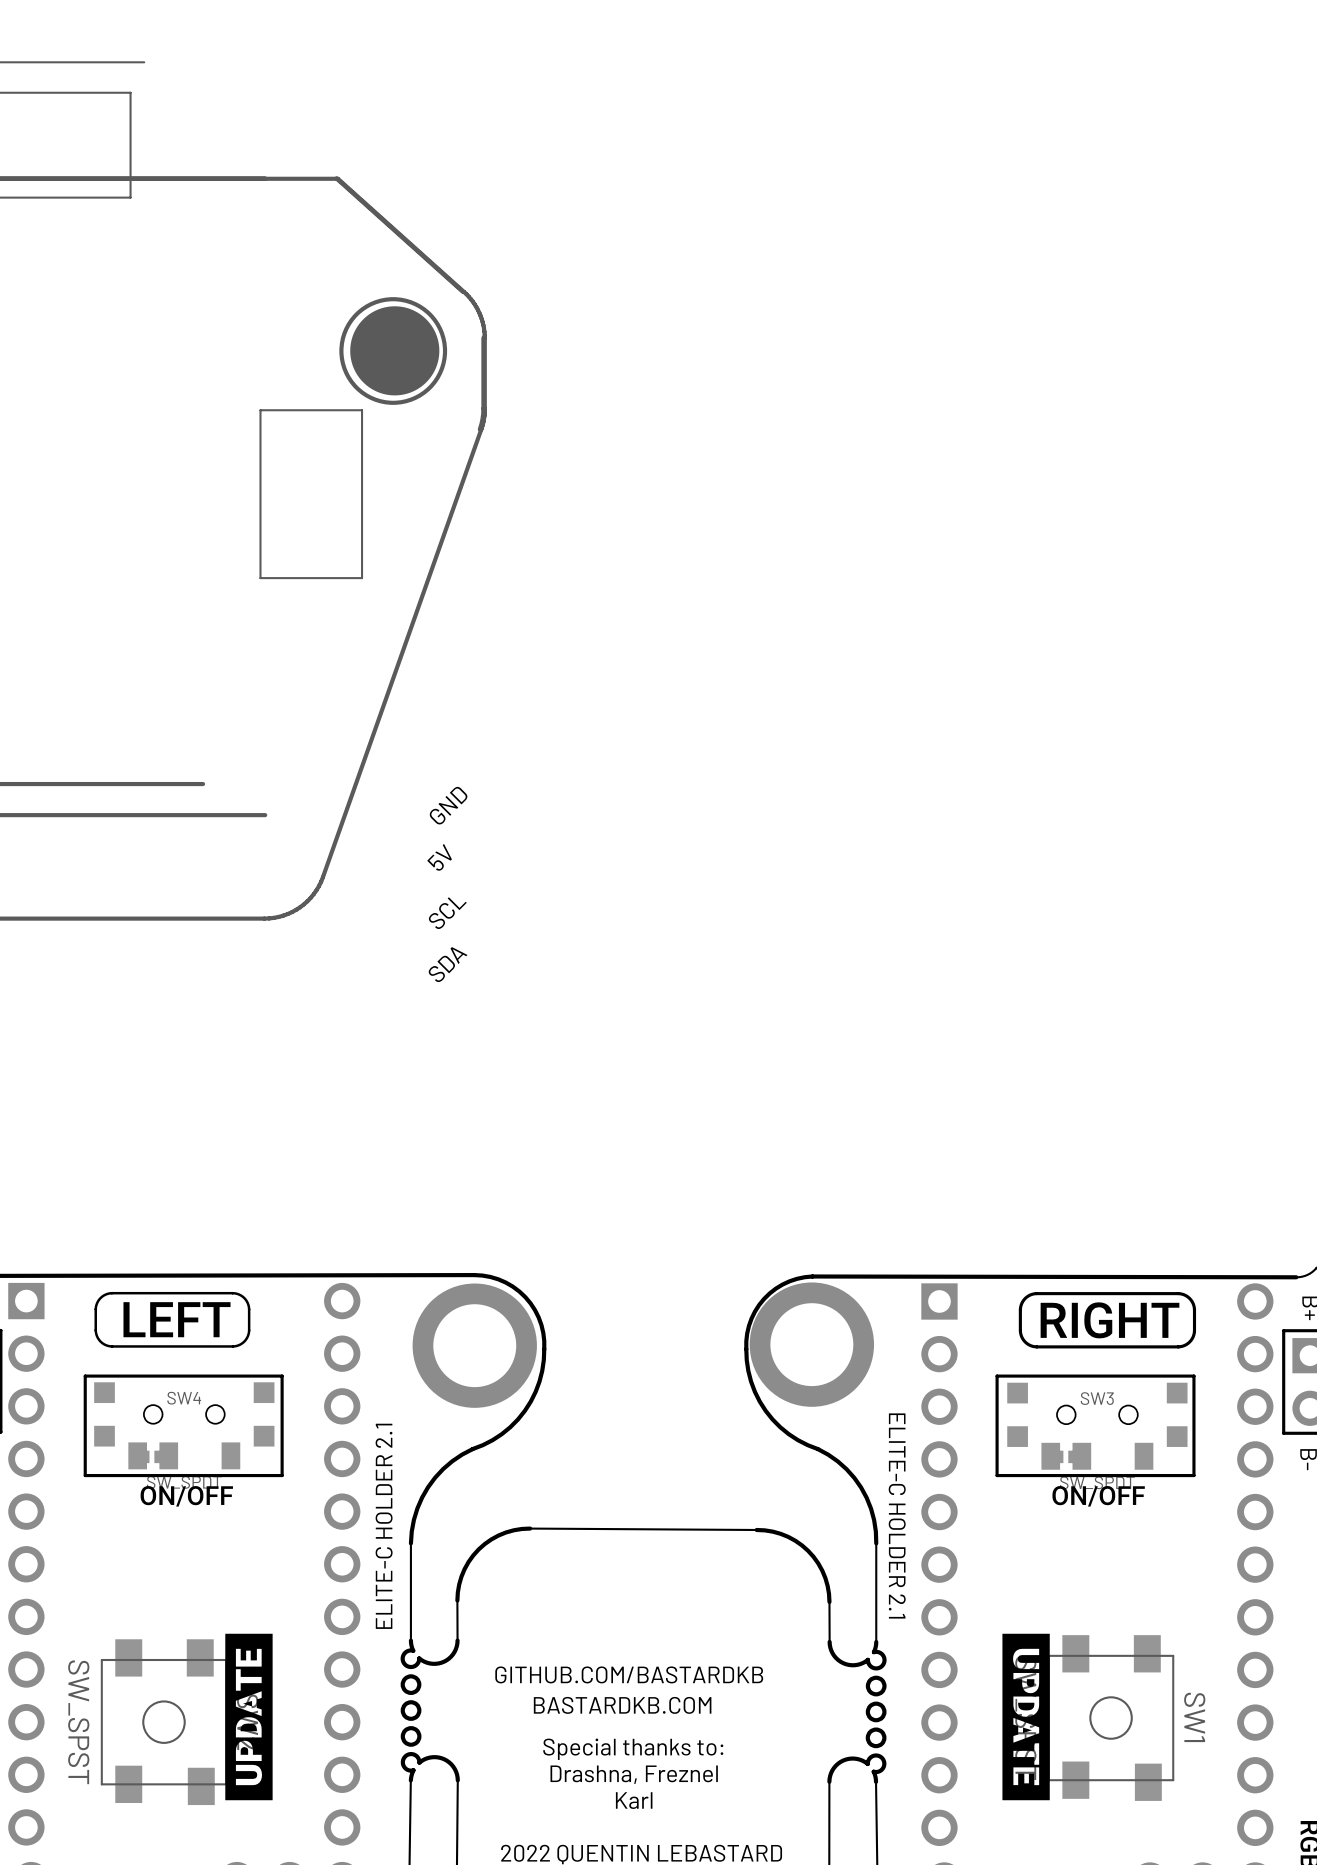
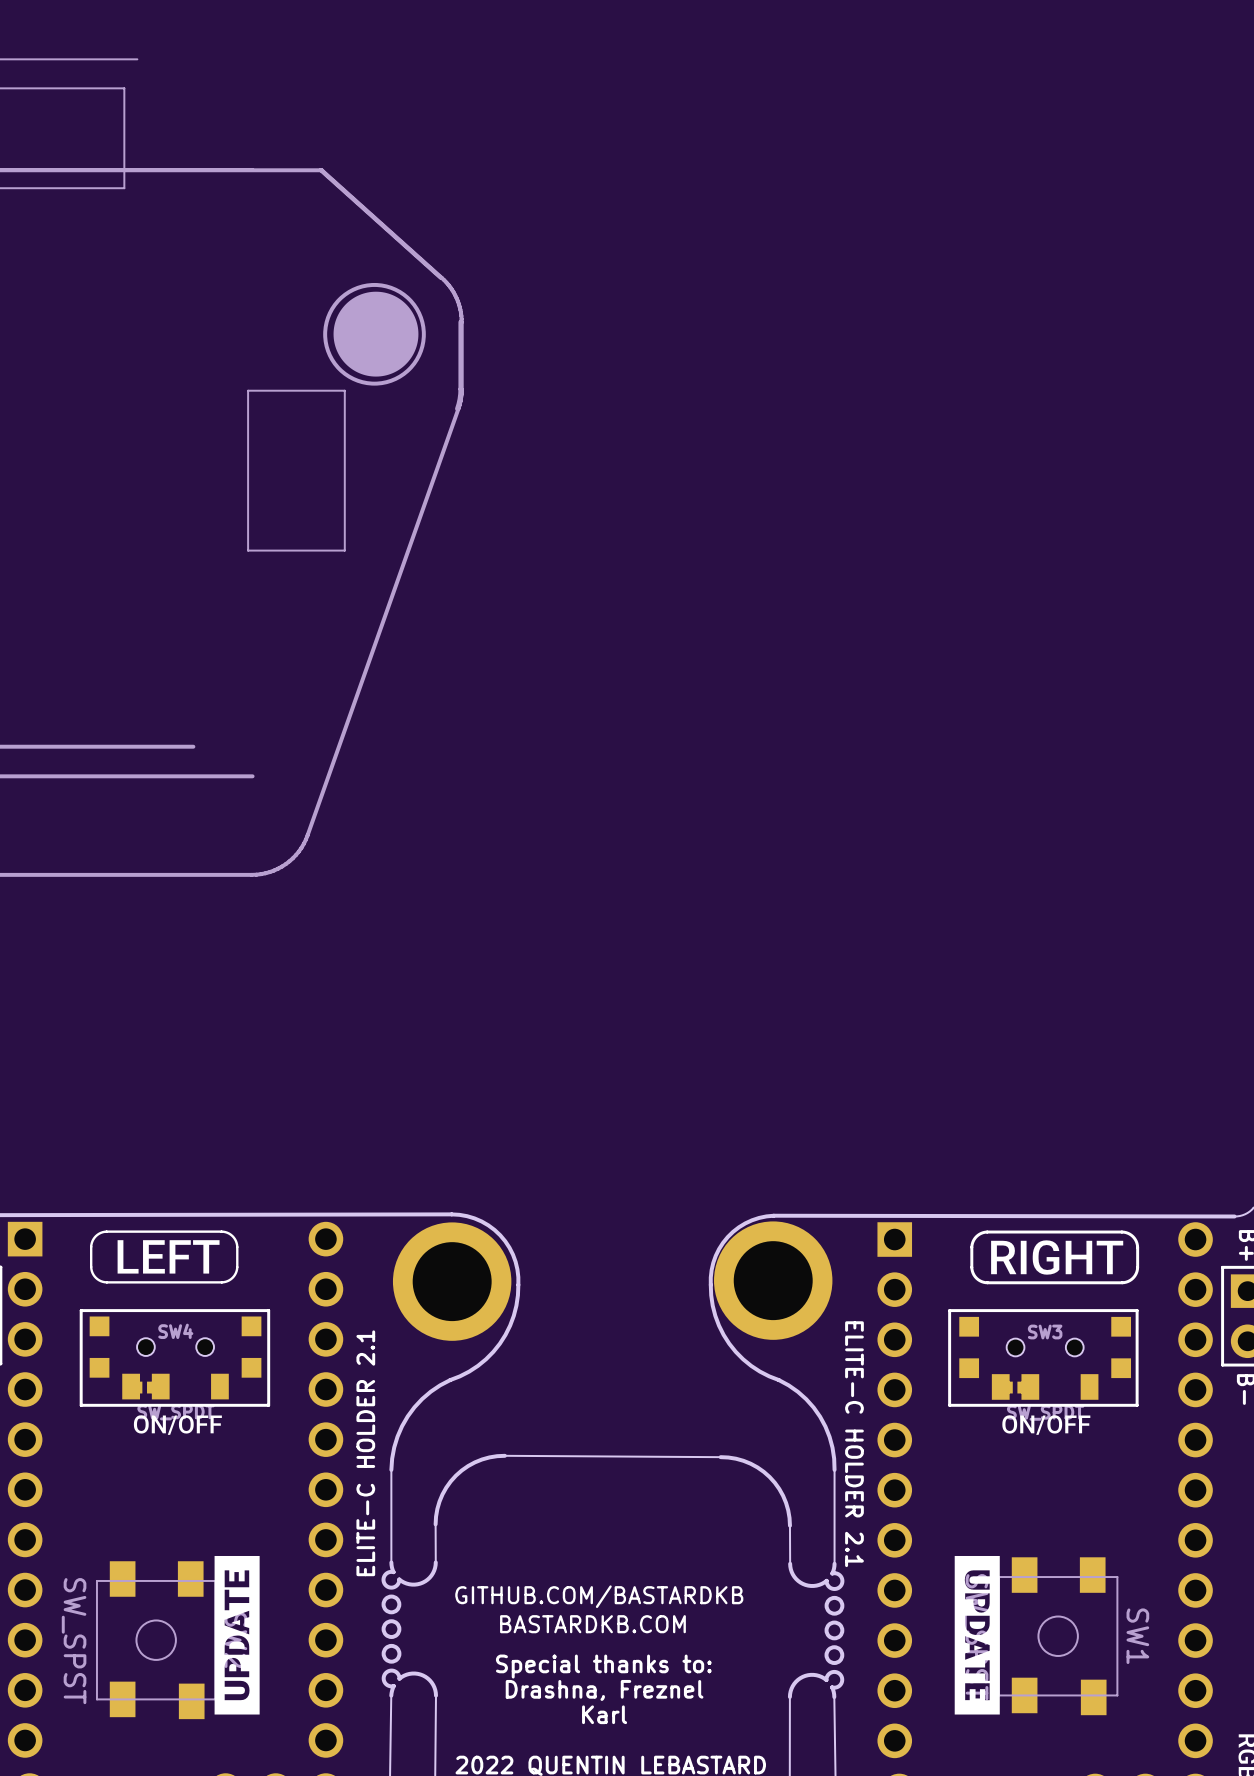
text: GND (448, 805) -> none
text: 5V (439, 857) -> none
text: SCL (447, 913) -> none
text: SDA (448, 964) -> none

